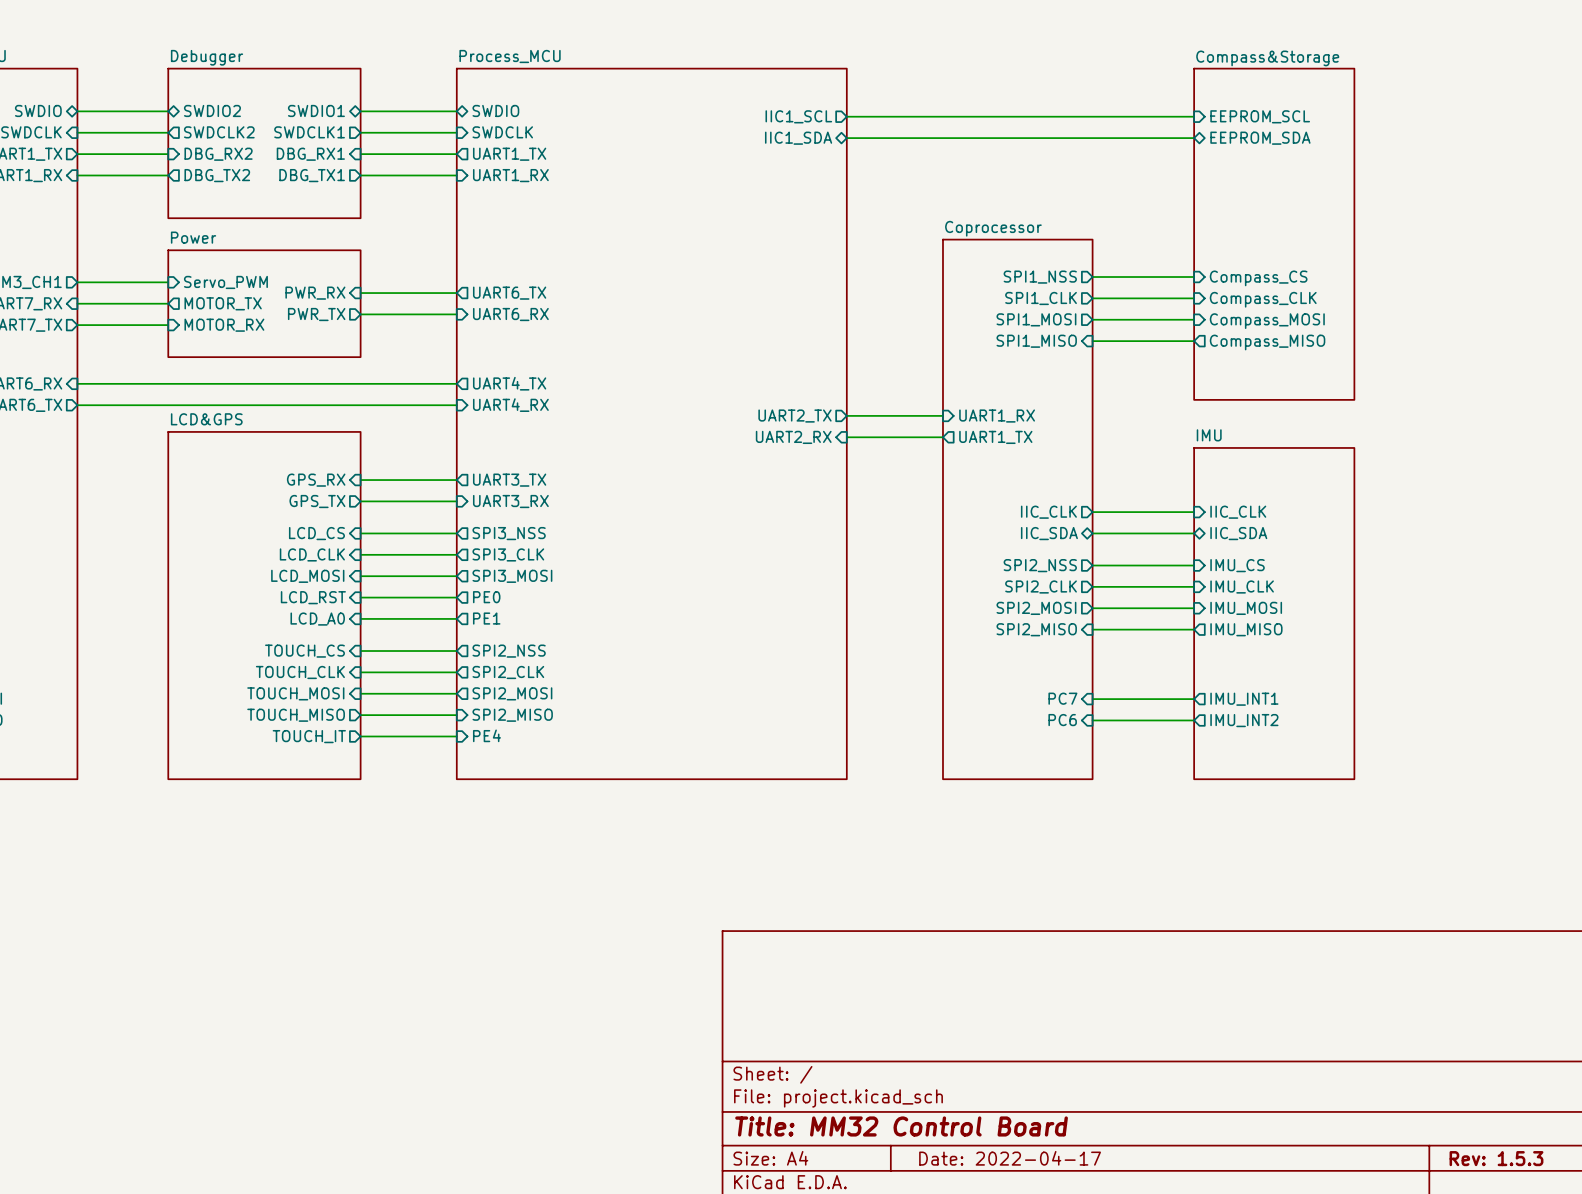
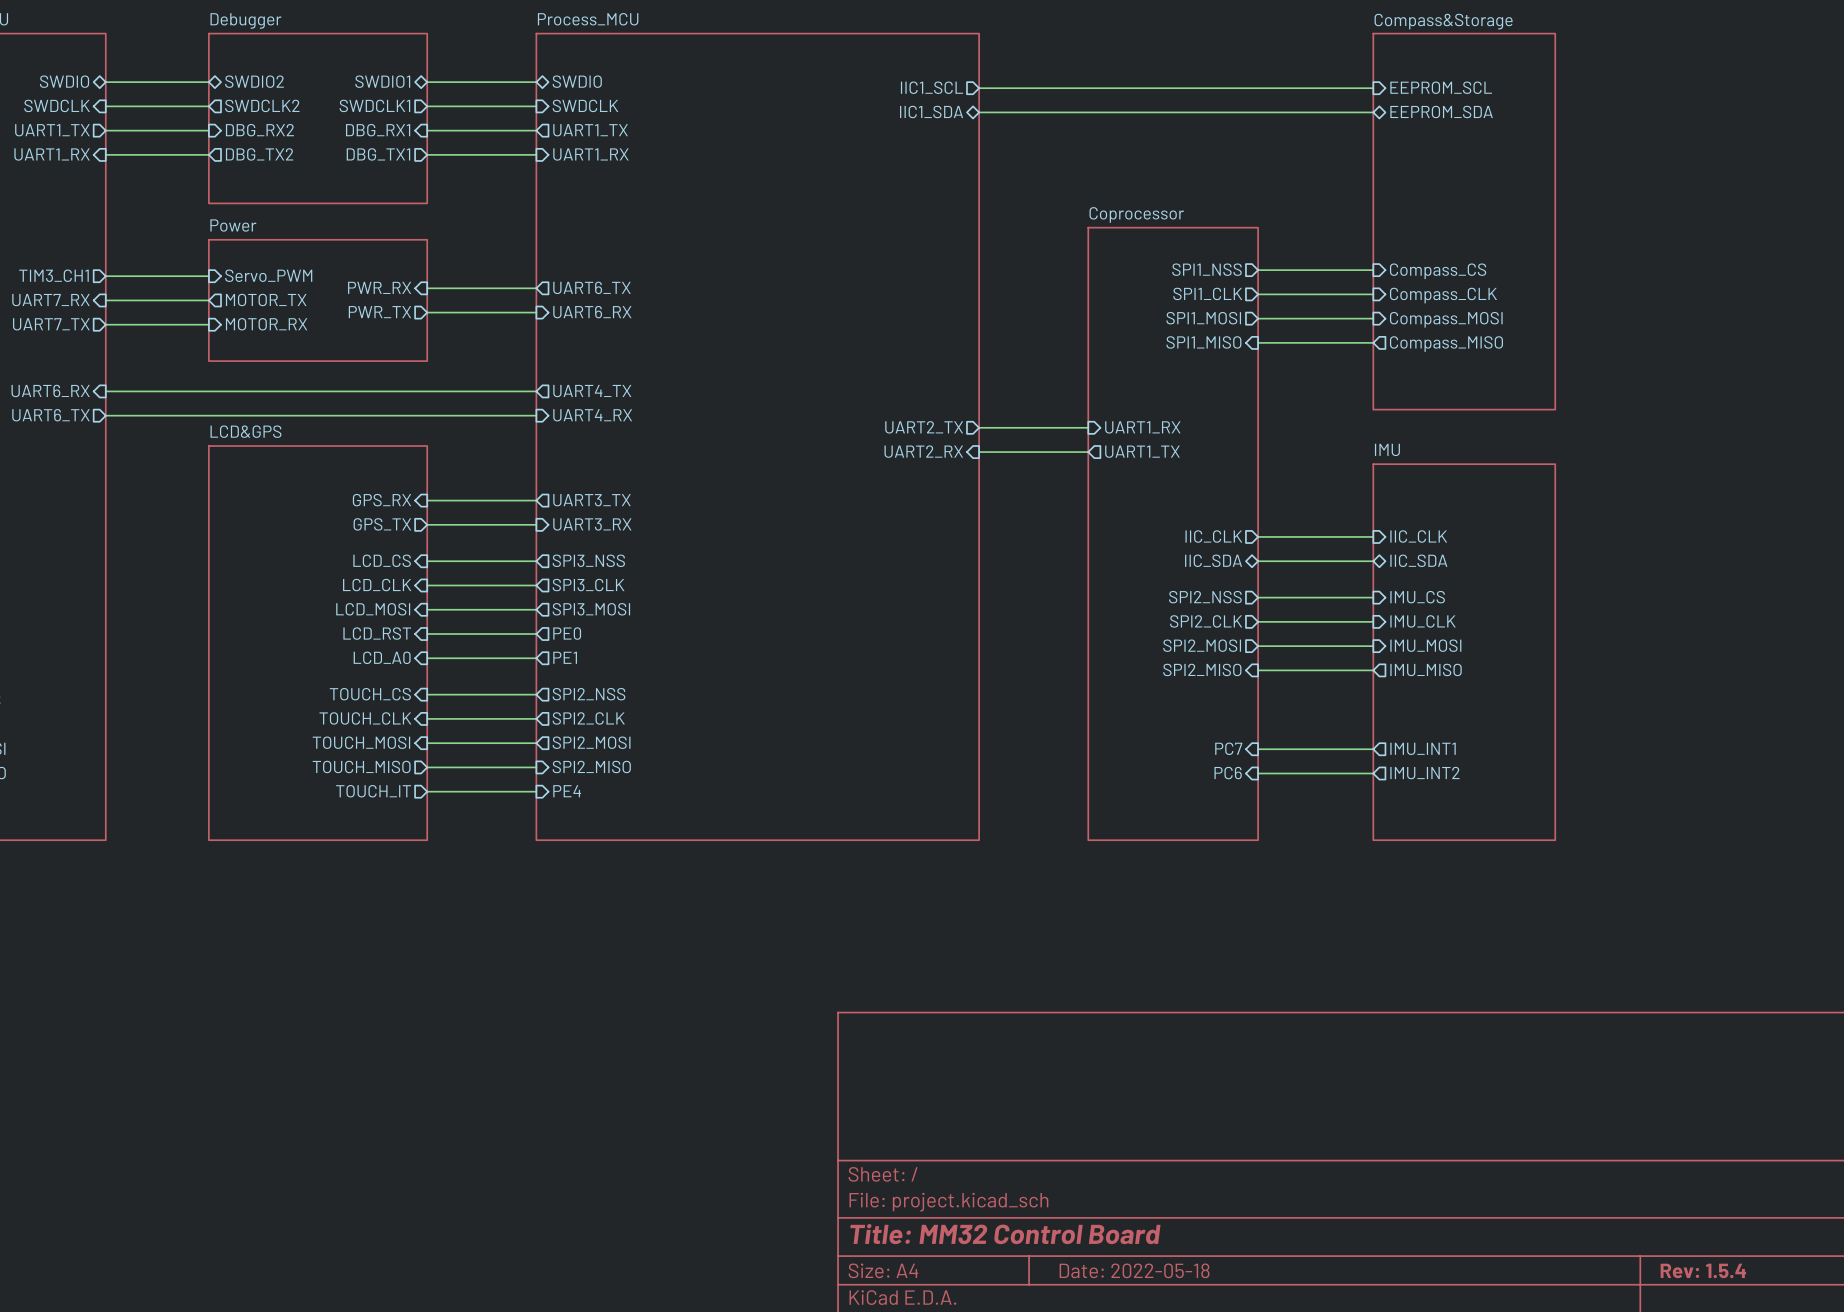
title block: Date: 2022-04-17 (1010, 1158) -> Date: 2022-05-18 (1134, 1270)
title block: Rev: 1.5.3 (1496, 1158) -> Rev: 1.5.4 (1703, 1270)

